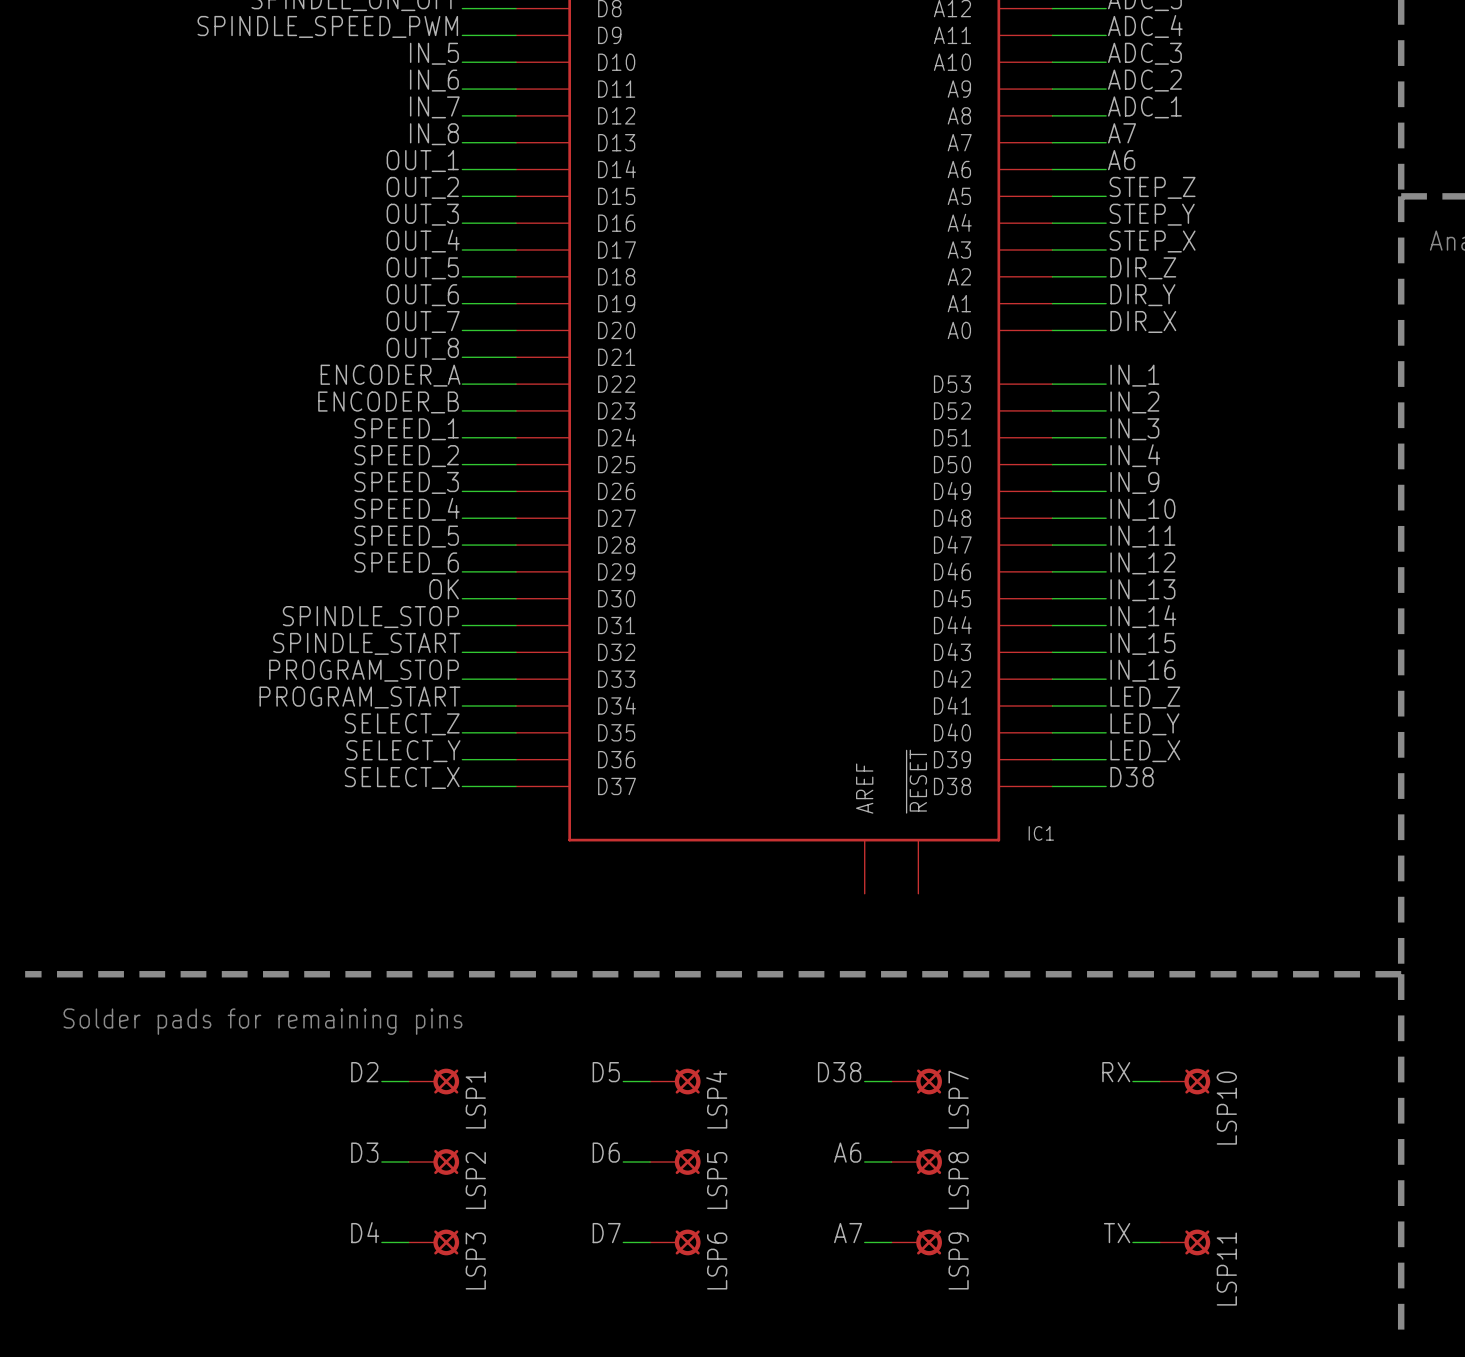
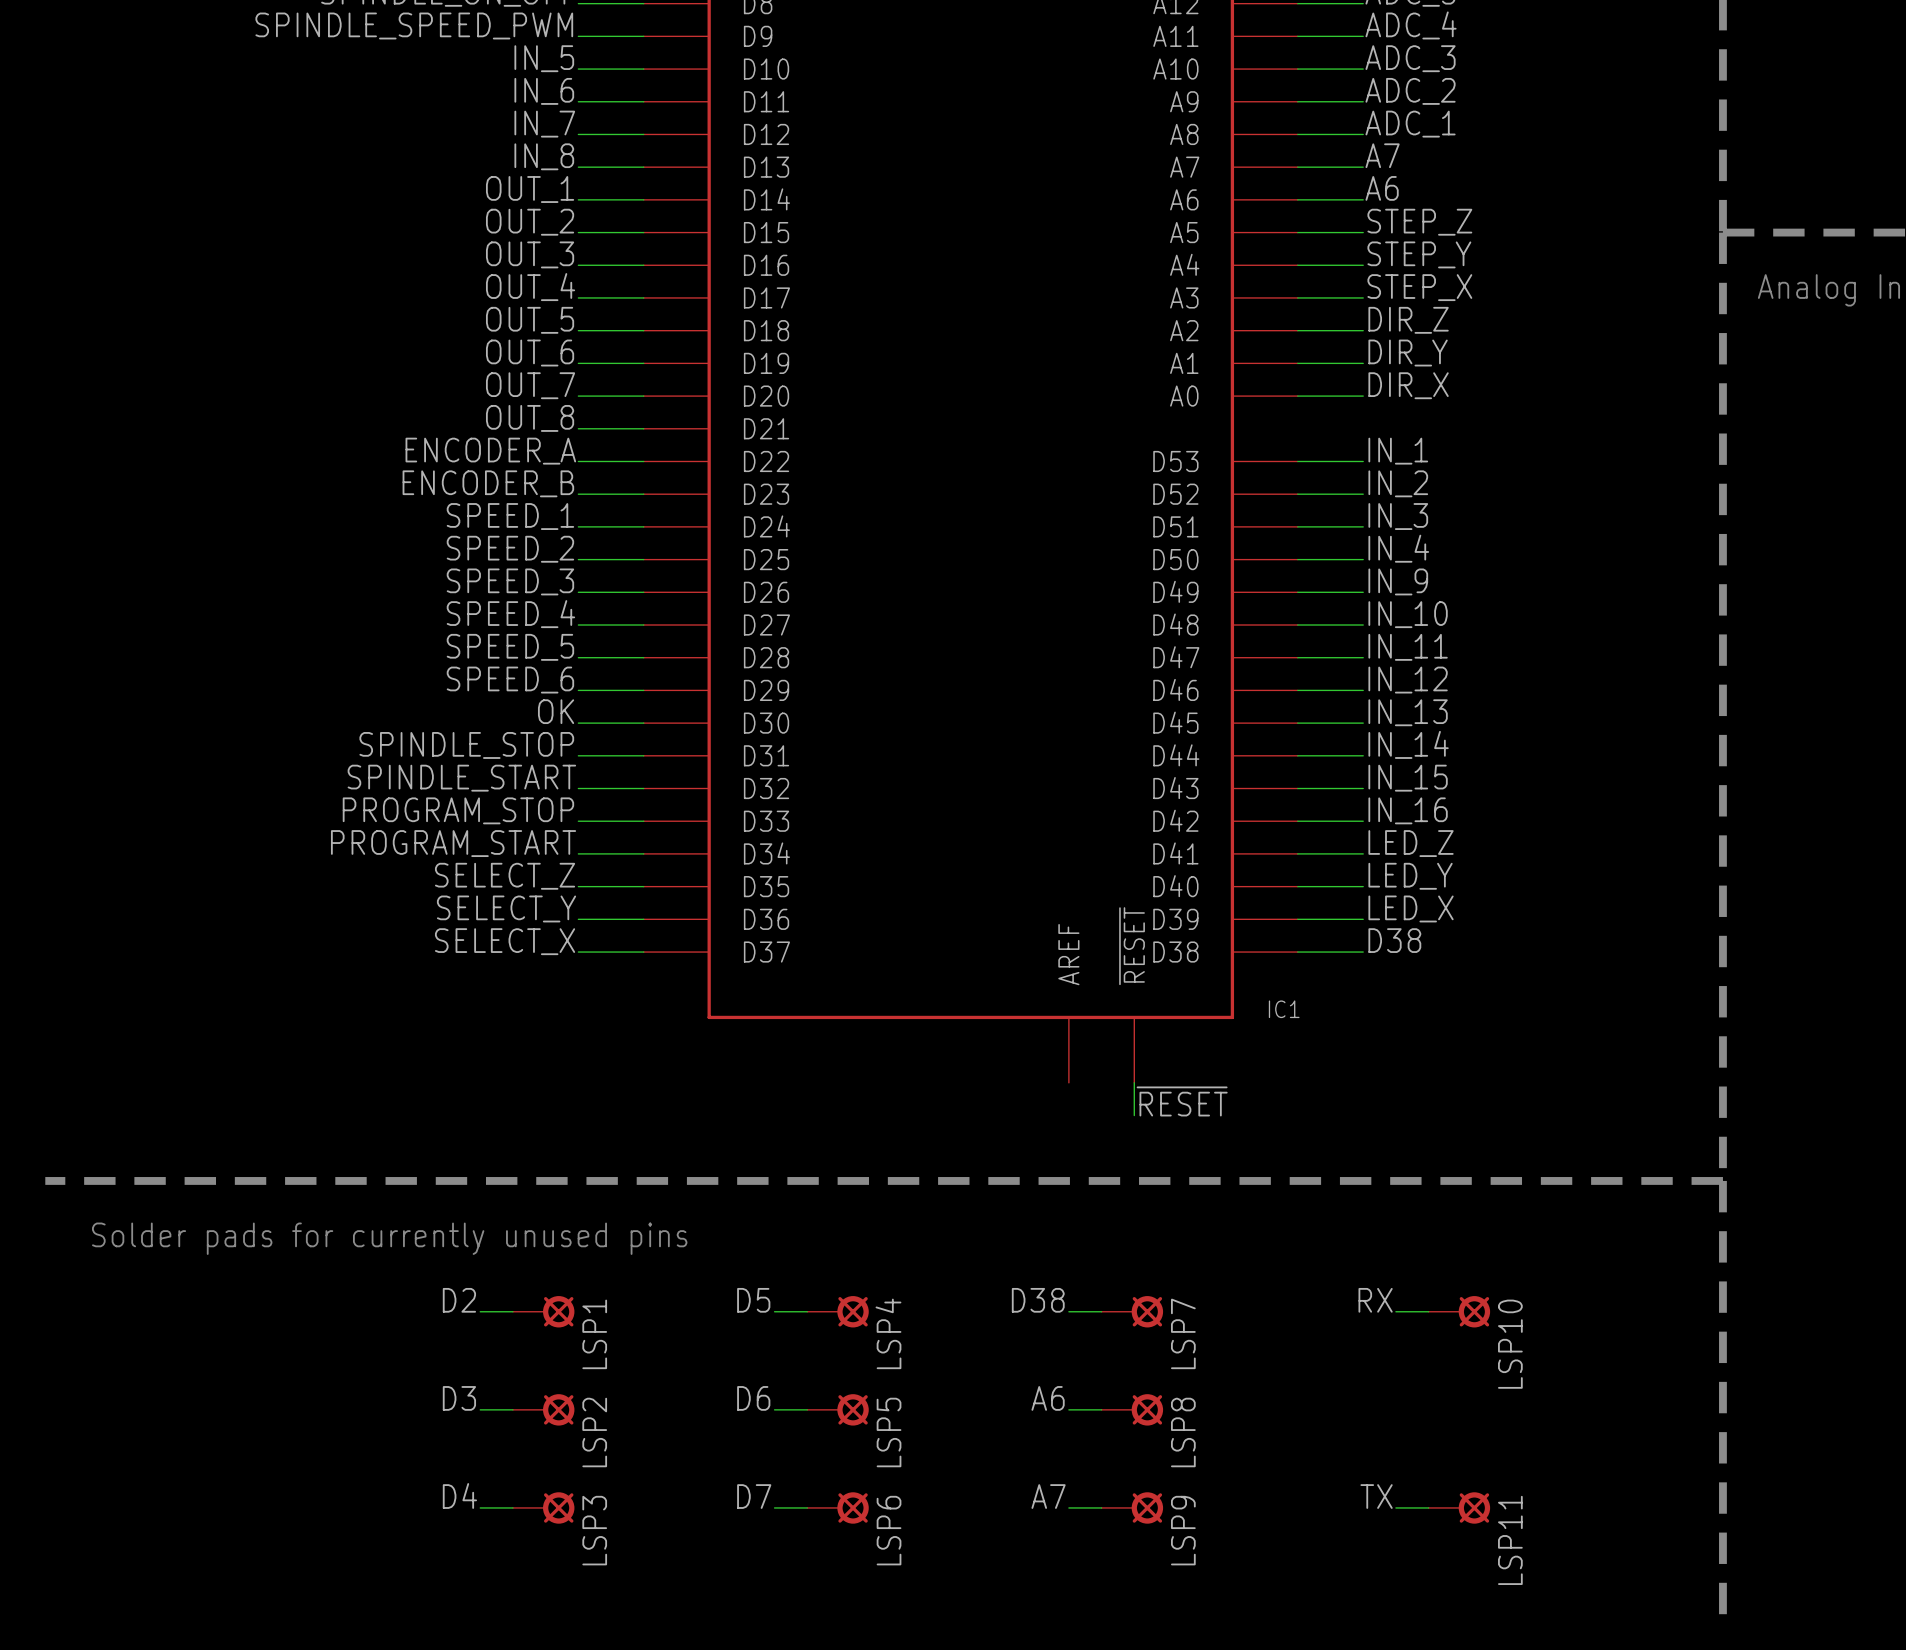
wire: none -> (1134, 1082) (1134, 1115)
label: none -> ~{RESET} (1182, 1101)
text: Solder pads for remaining pins (262, 1021) -> Solder pads for currently unused pins (389, 1238)

